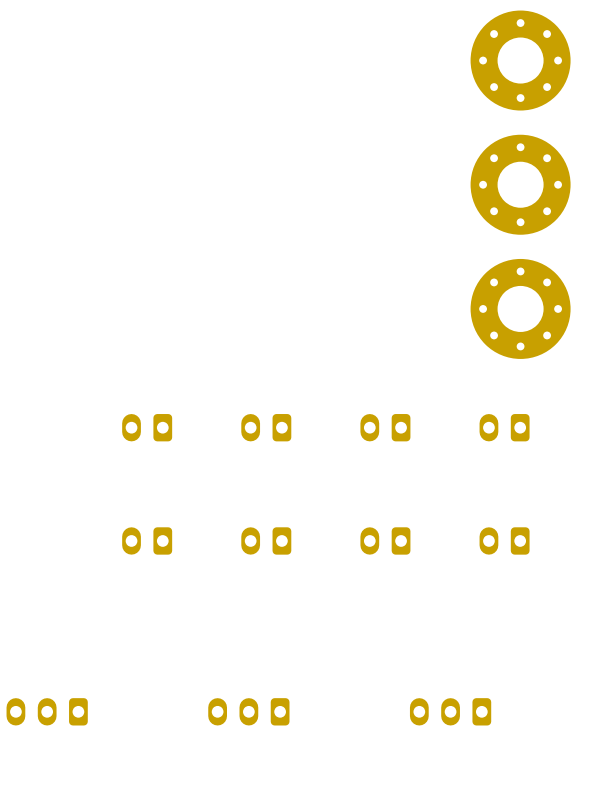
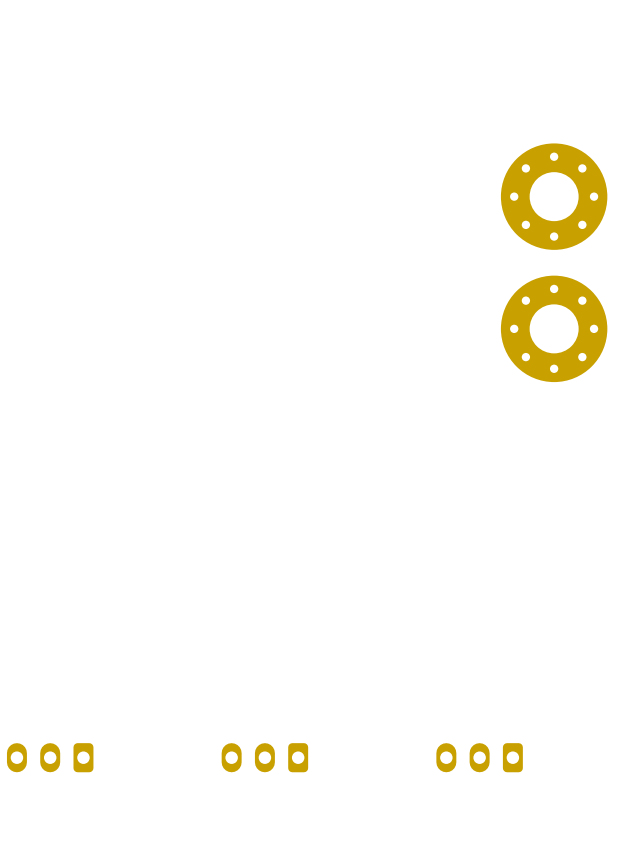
part: (520, 60) -> none
part: (147, 427) -> none
part: (266, 427) -> none
part: (385, 427) -> none
part: (504, 427) -> none
part: (147, 540) -> none
part: (266, 540) -> none
part: (385, 540) -> none
part: (504, 540) -> none

